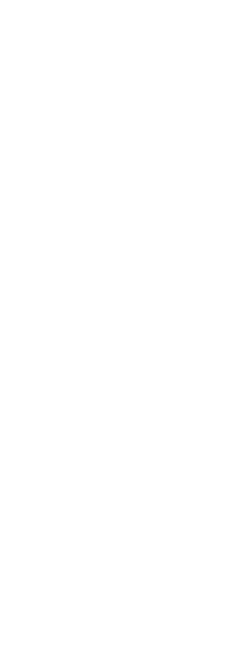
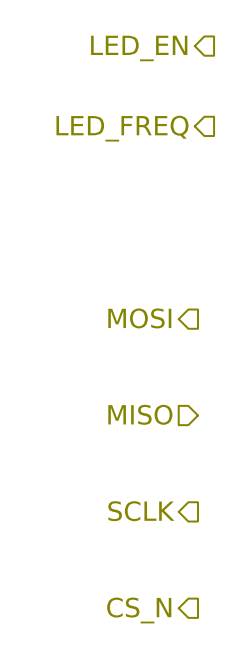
hierarchical label: none -> LED_EN (139, 48)
hierarchical label: none -> LED_FREQ (122, 128)
hierarchical label: none -> MOSI (139, 318)
hierarchical label: none -> MISO (140, 414)
hierarchical label: none -> SCLK (141, 511)
hierarchical label: none -> CS_N (139, 610)

